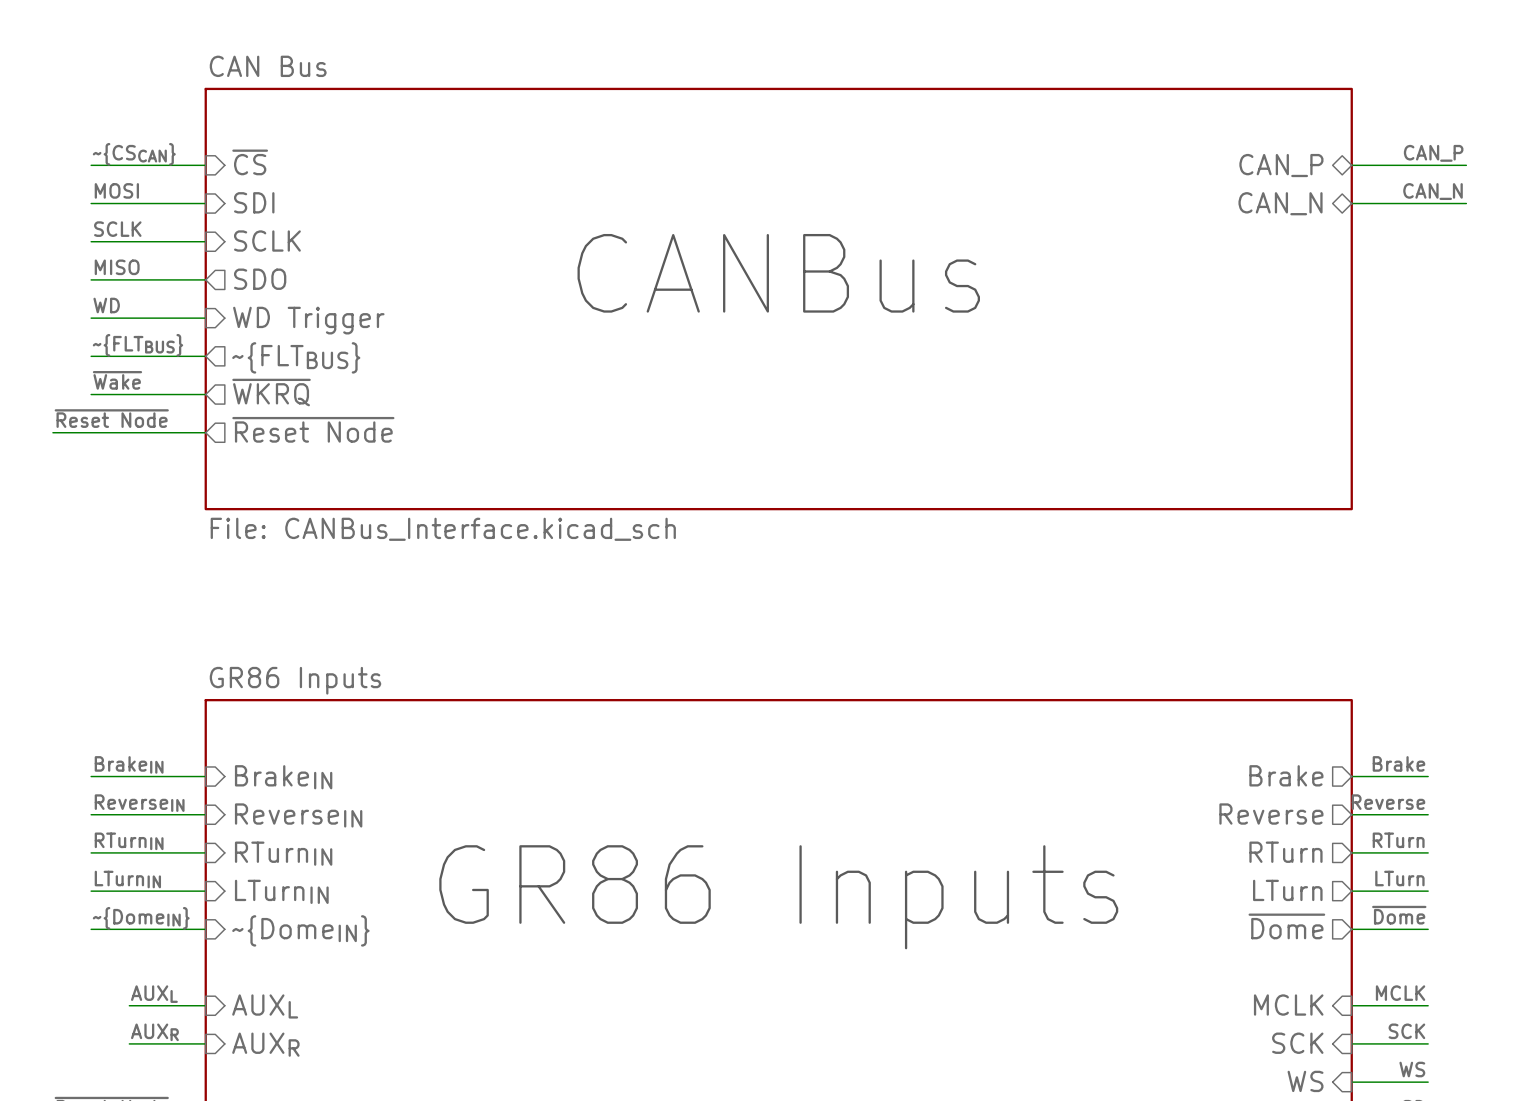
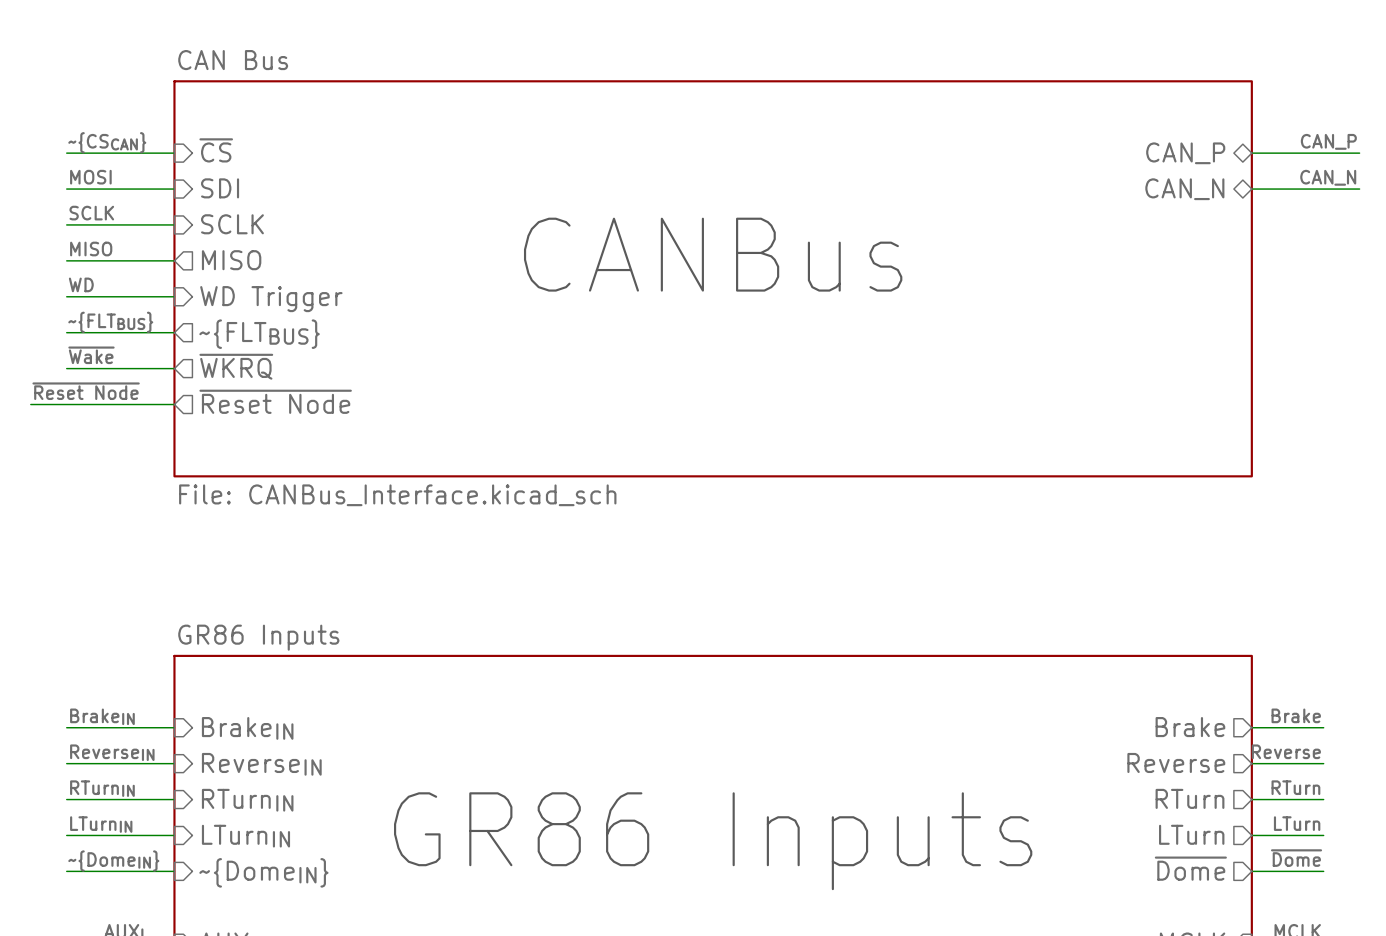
sheet pin: SDO (260, 279) -> MISO (231, 260)

